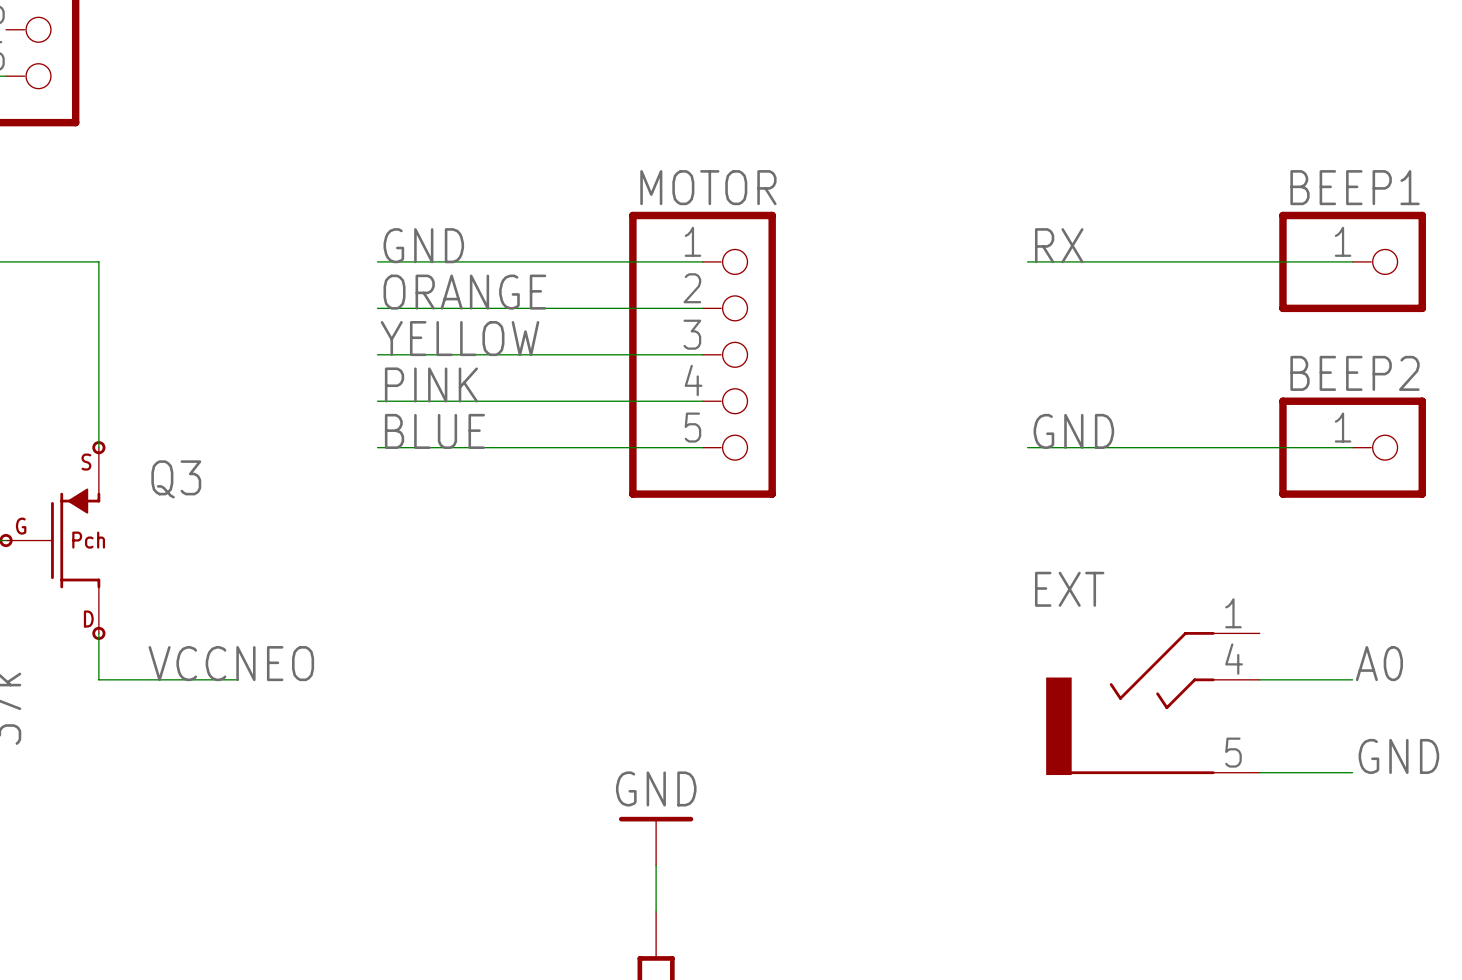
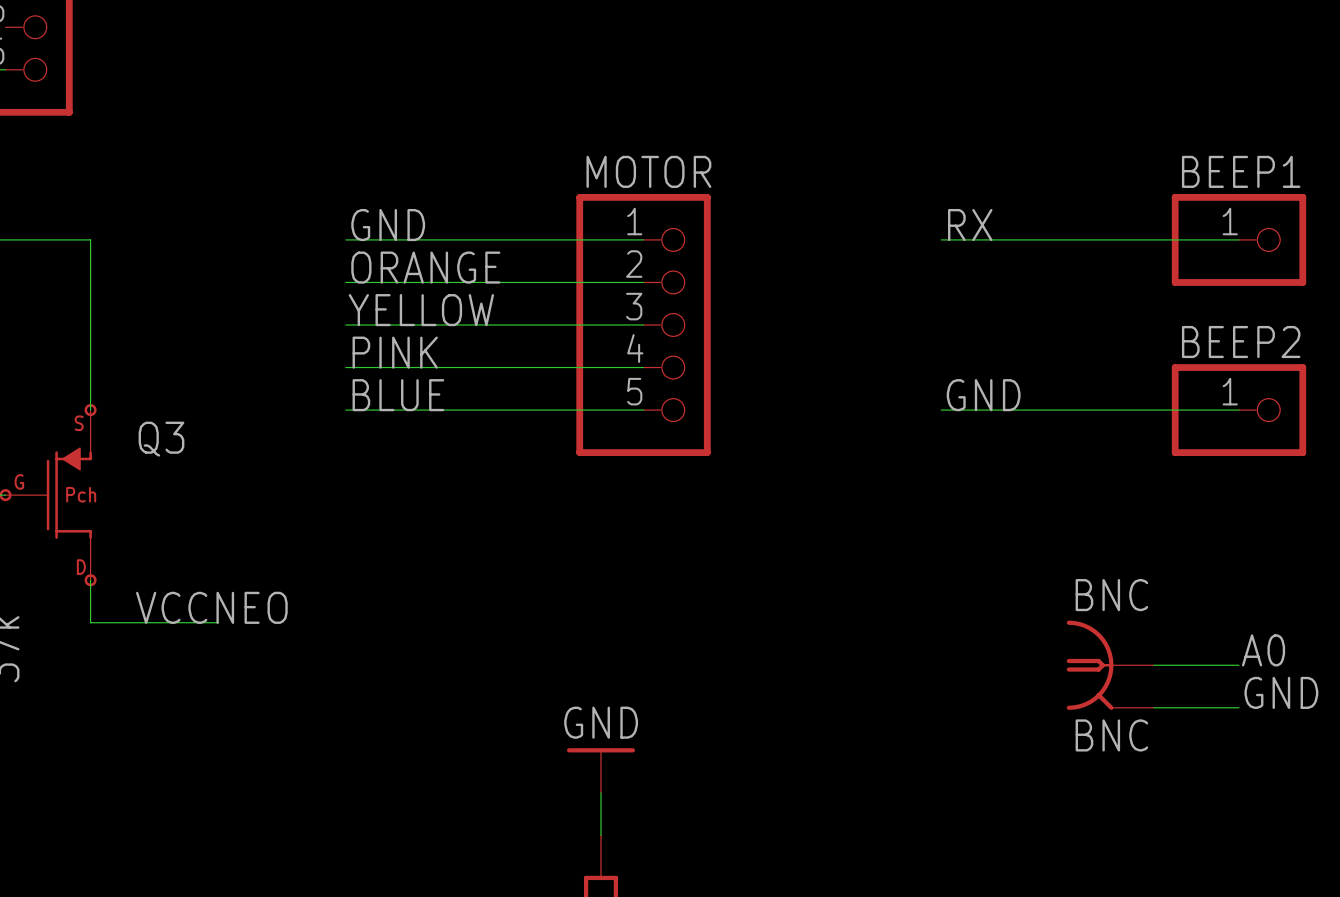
label position: A0 (1379, 663) -> A0 (1263, 650)
wire: (1259, 679) (1352, 679) -> (1153, 665) (1238, 665)
EXT: (1152, 703) -> none
BNC: none -> BNC (1110, 665)

